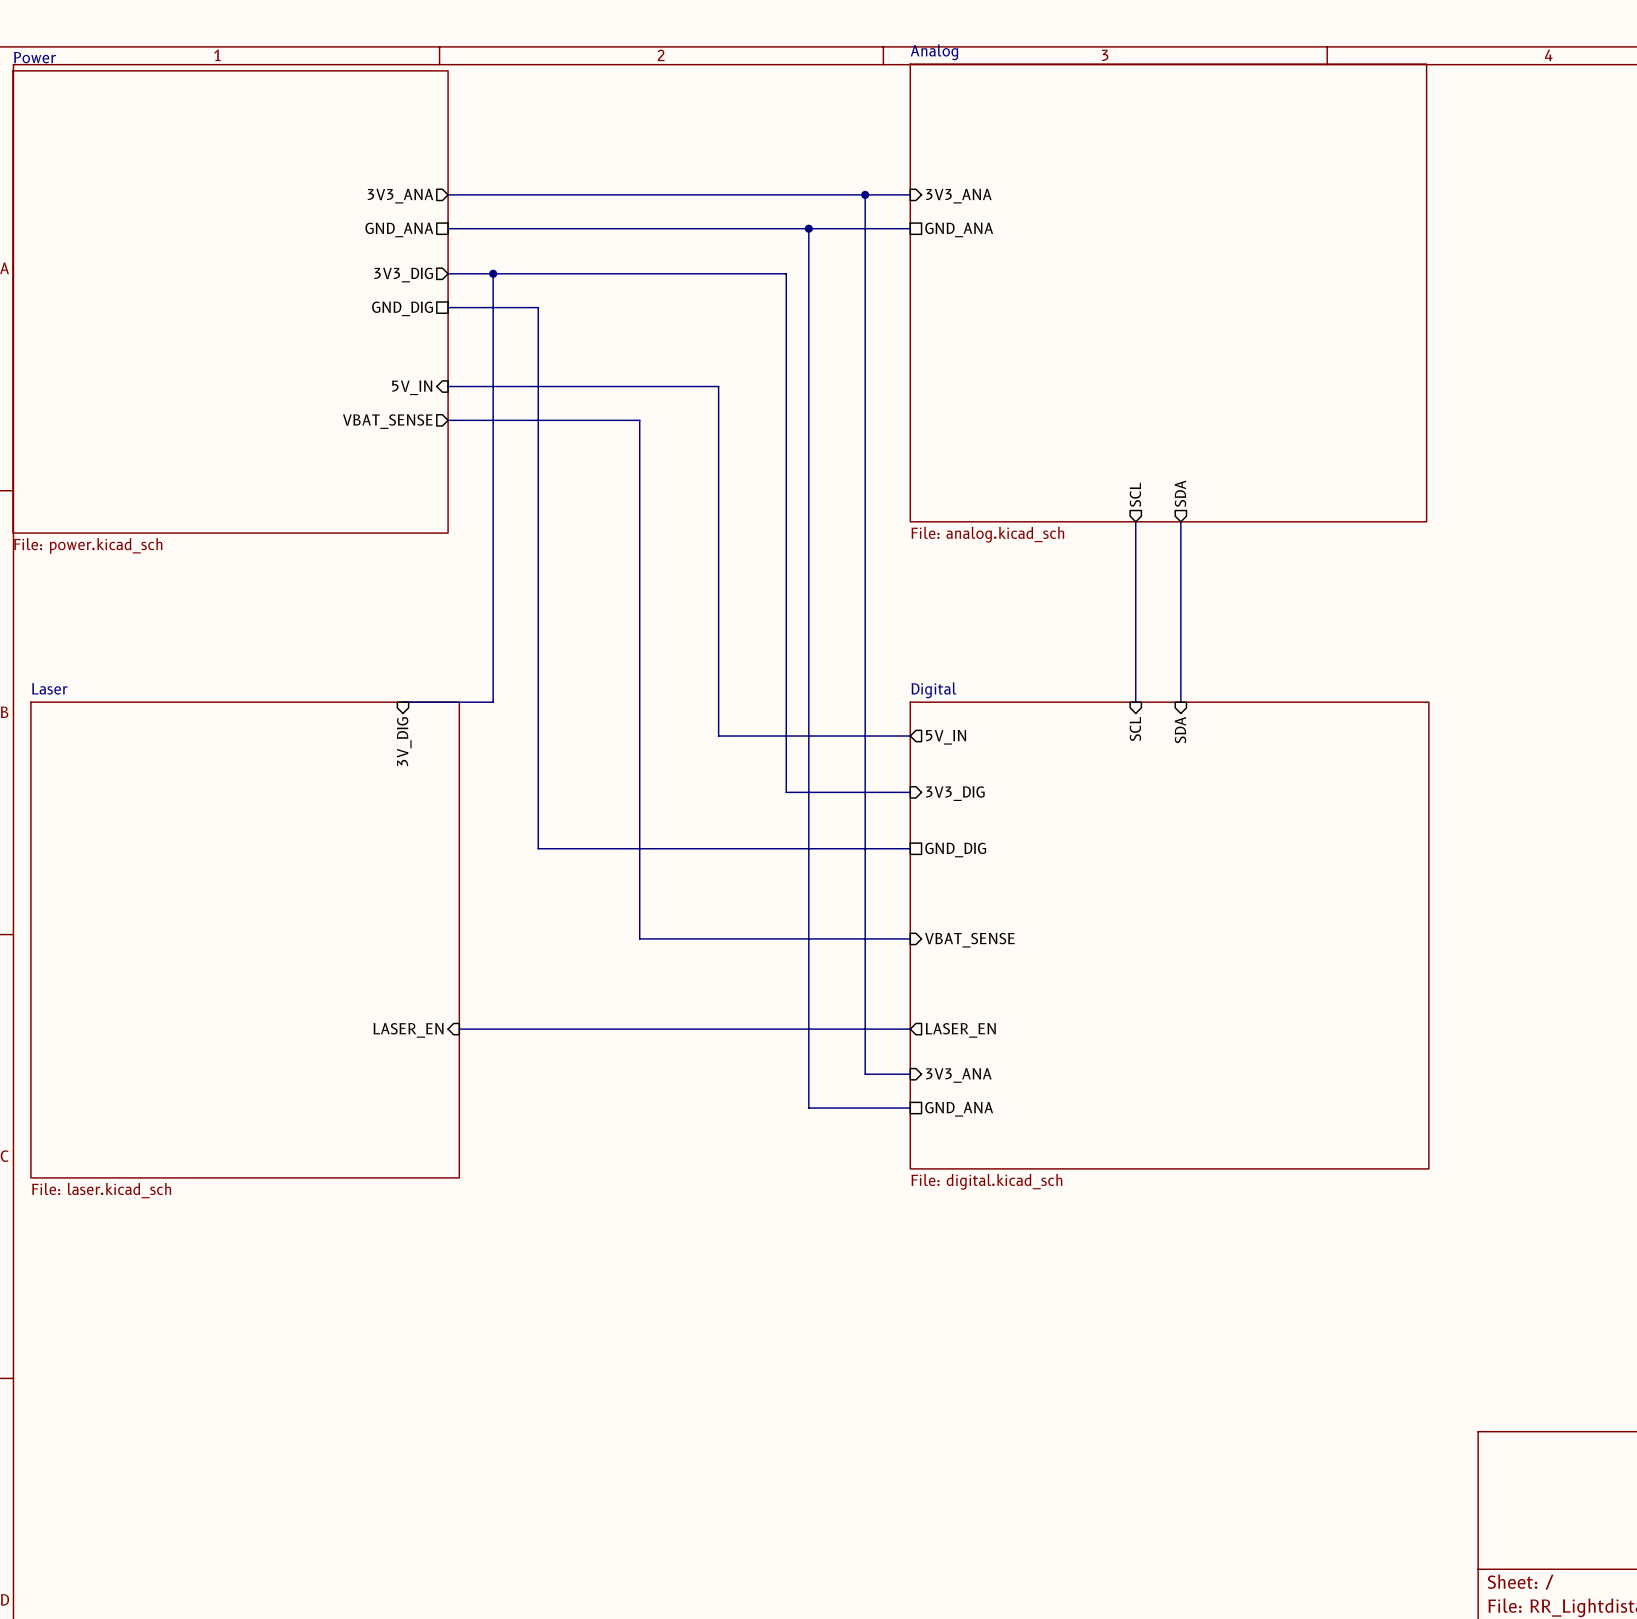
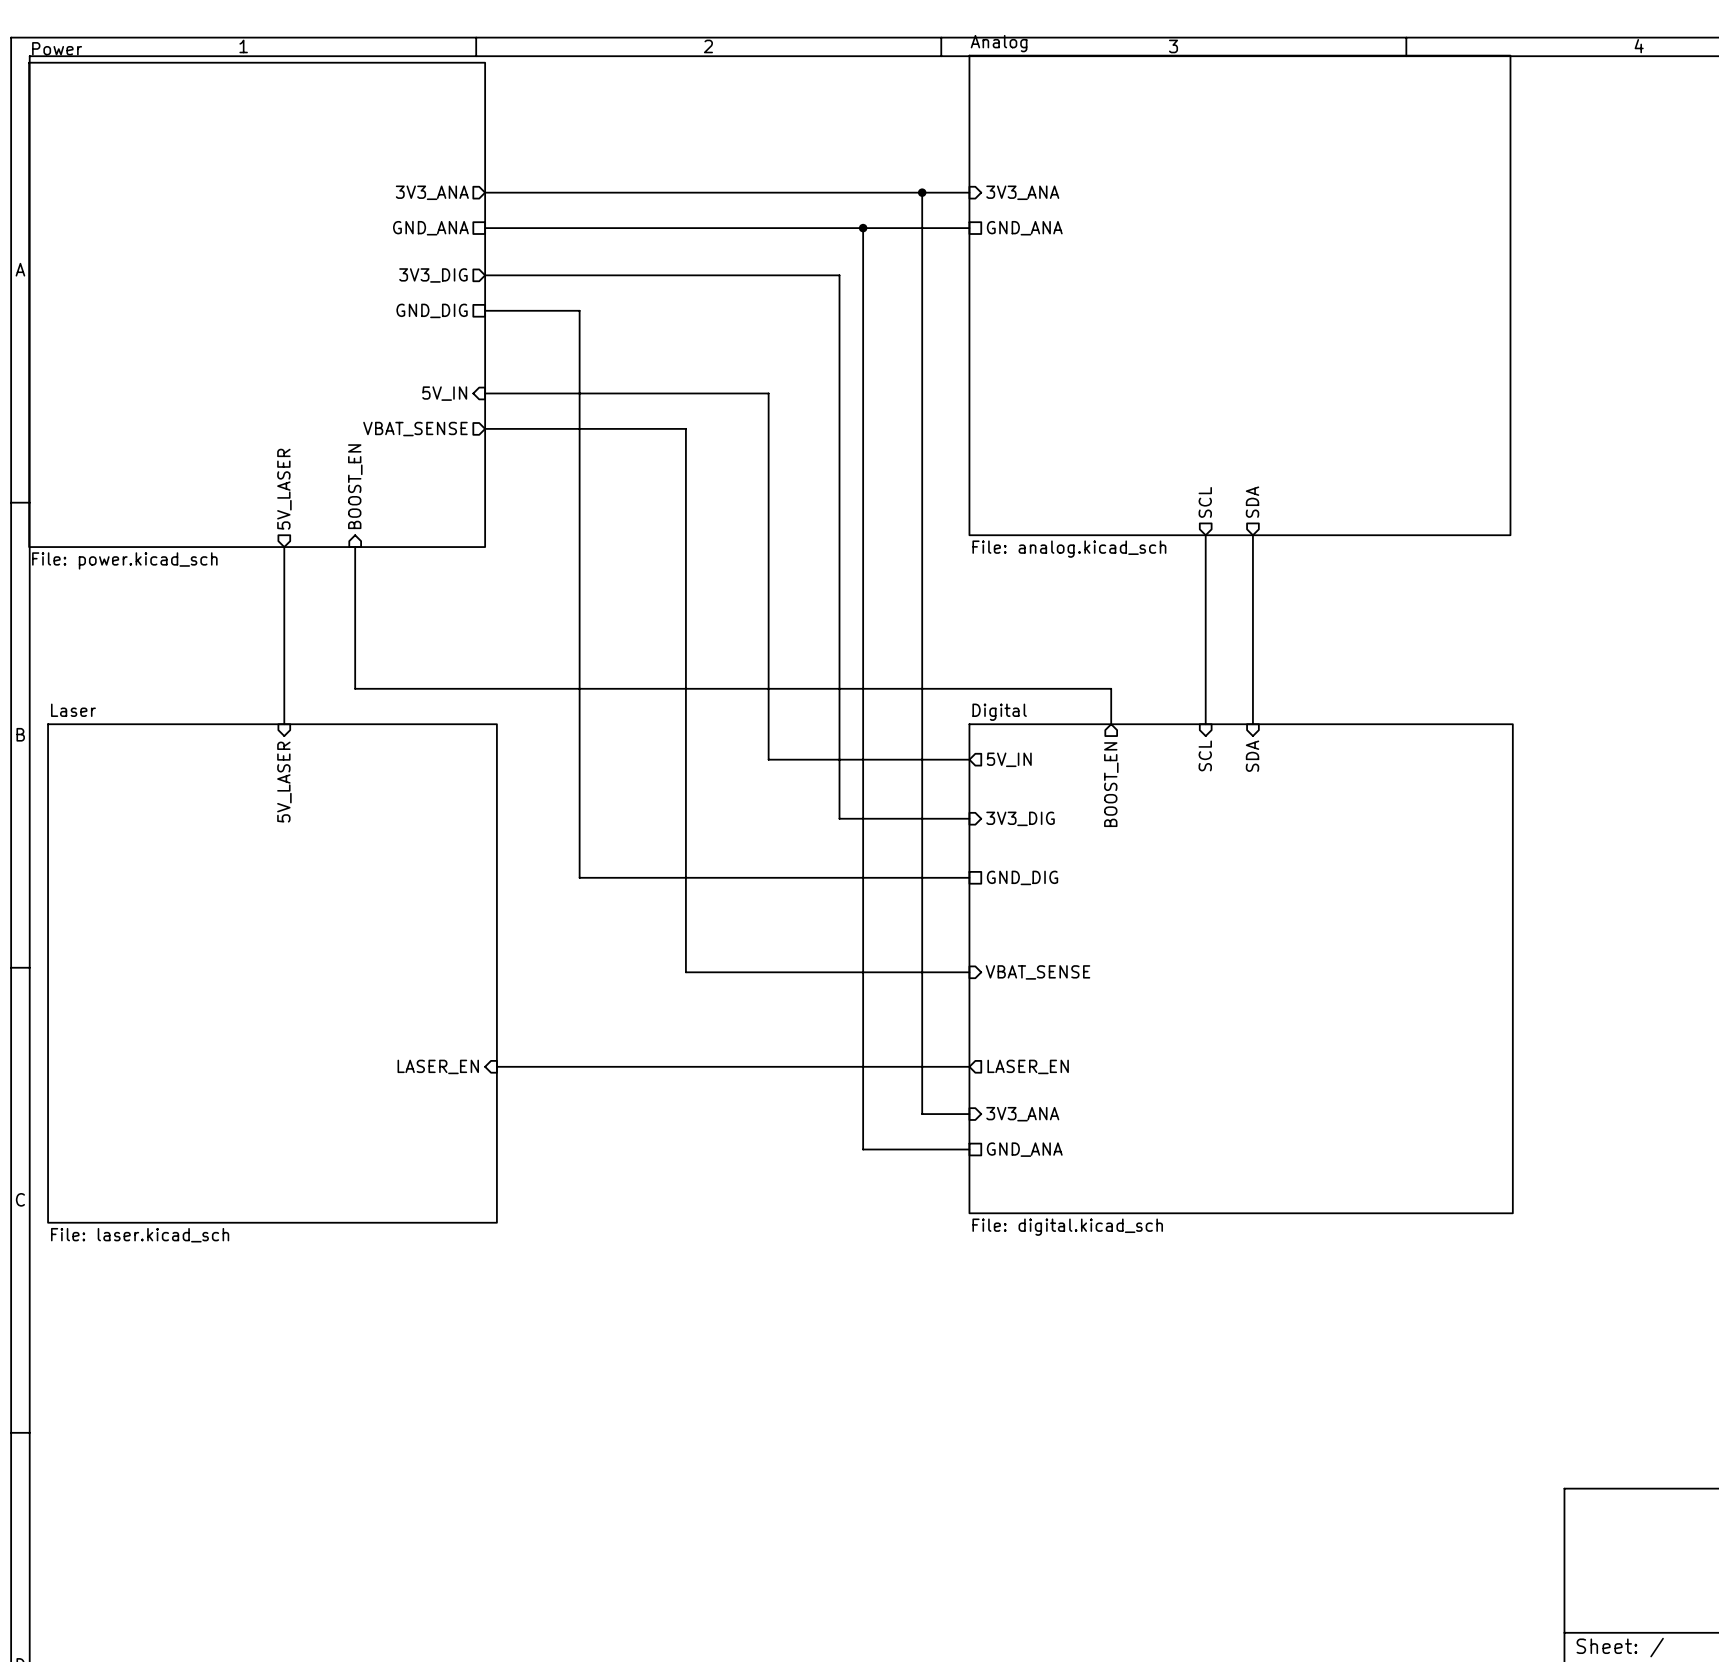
wire: (493, 273) (493, 702) (402, 702) -> none
junction: (493, 273) -> none
sheet pin: none -> BOOST_EN (355, 486)
sheet pin: none -> 5V_LASER (284, 489)
wire: none -> (284, 547) (284, 724)
wire: none -> (355, 547) (355, 688) (1111, 688) (1111, 724)
sheet pin: 3V_DIG (404, 741) -> none
sheet pin: none -> 5V_LASER (284, 782)
sheet pin: none -> BOOST_EN (1111, 784)

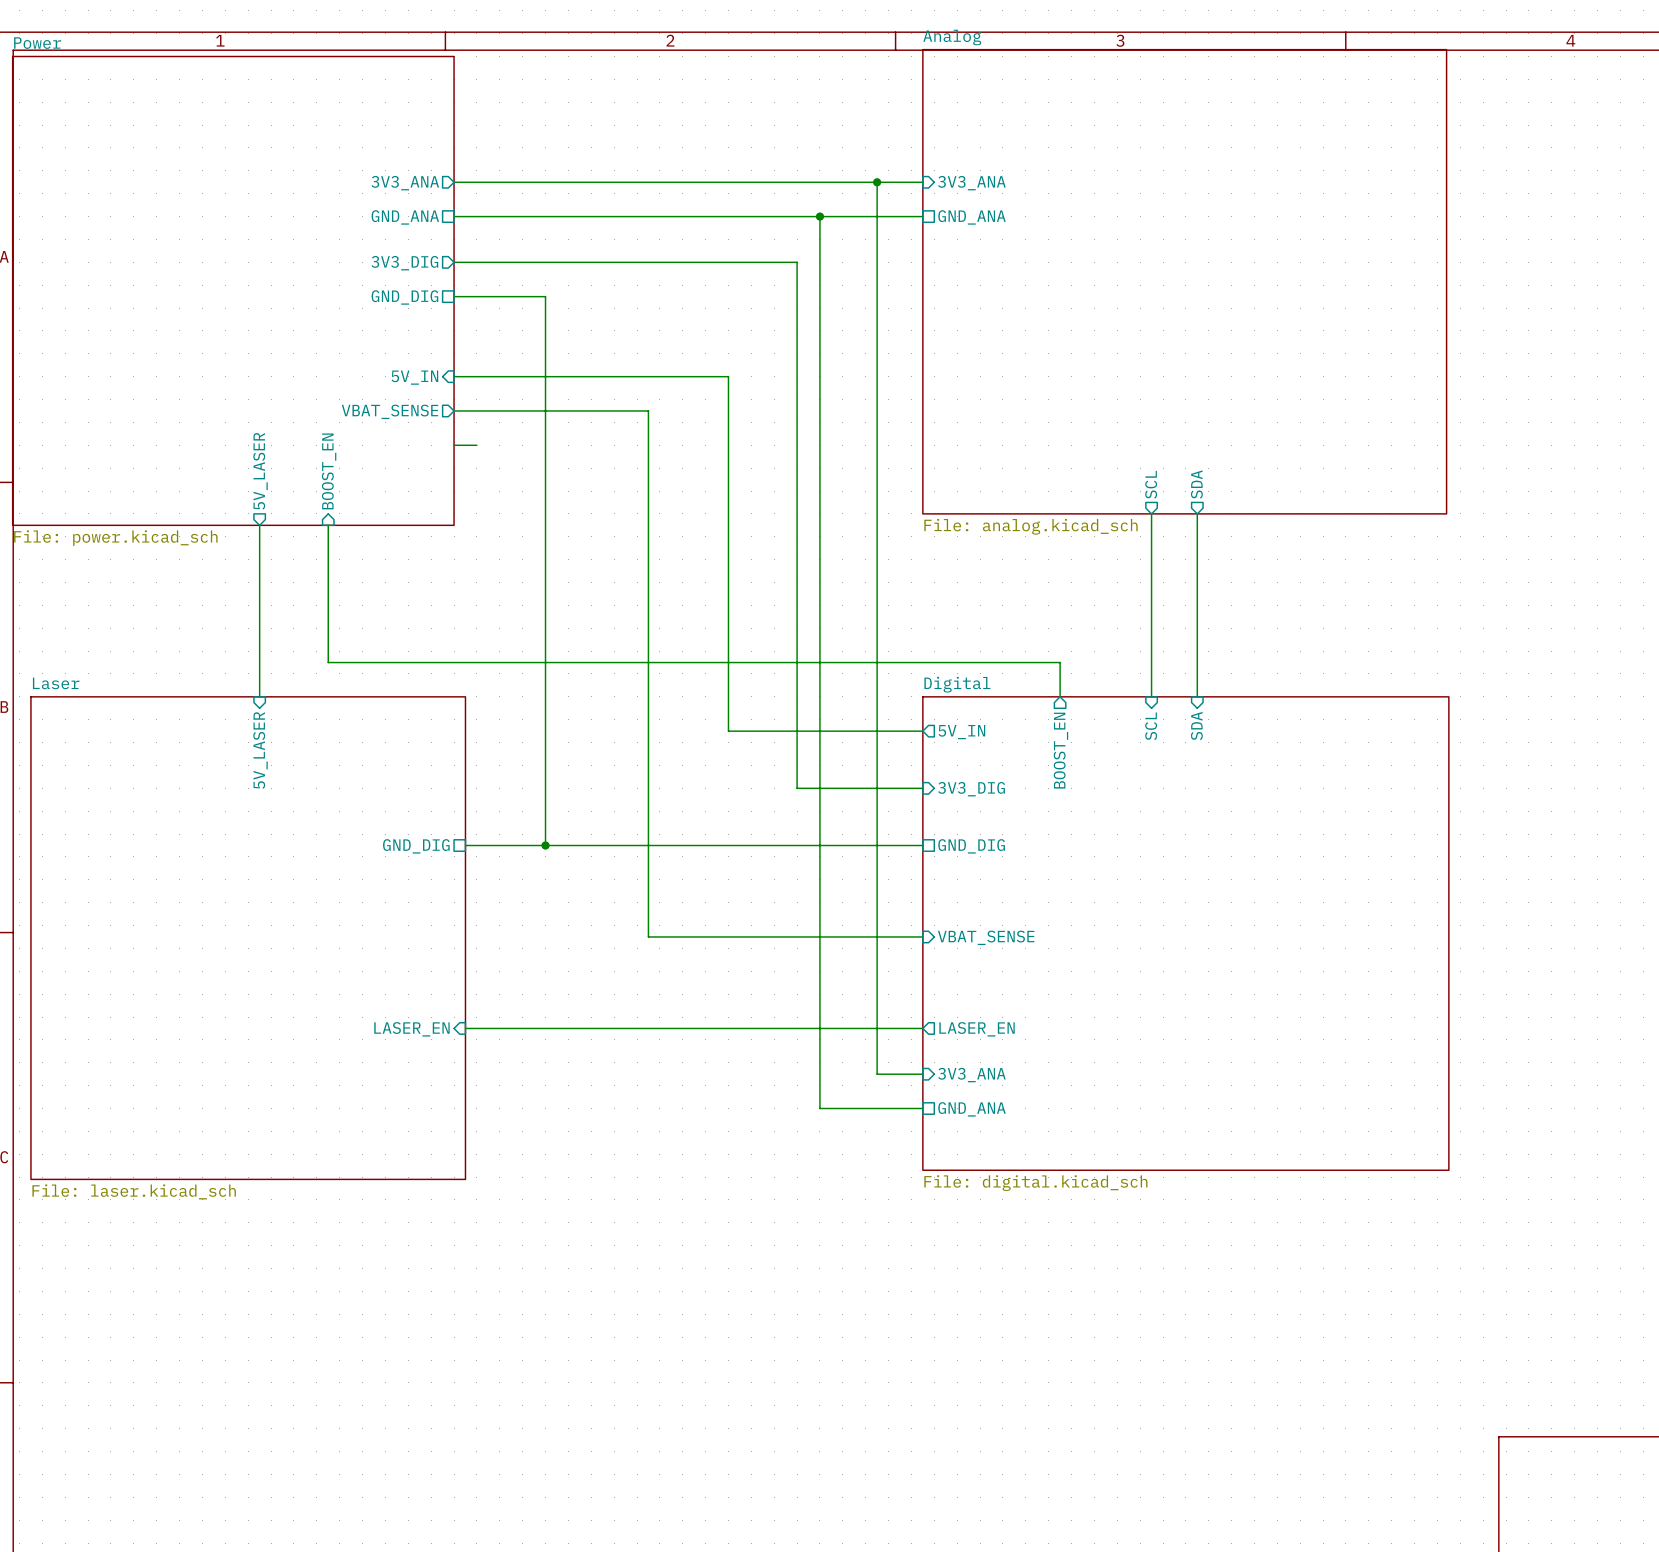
wire: none -> (454, 445) (476, 445)
sheet pin: none -> GND_DIG (416, 846)
wire: none -> (465, 845) (545, 845)
junction: none -> (545, 845)

